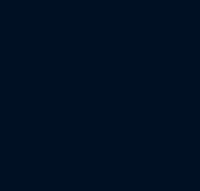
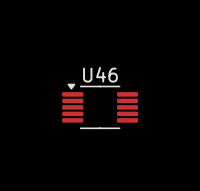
U46: none -> (100, 106)

